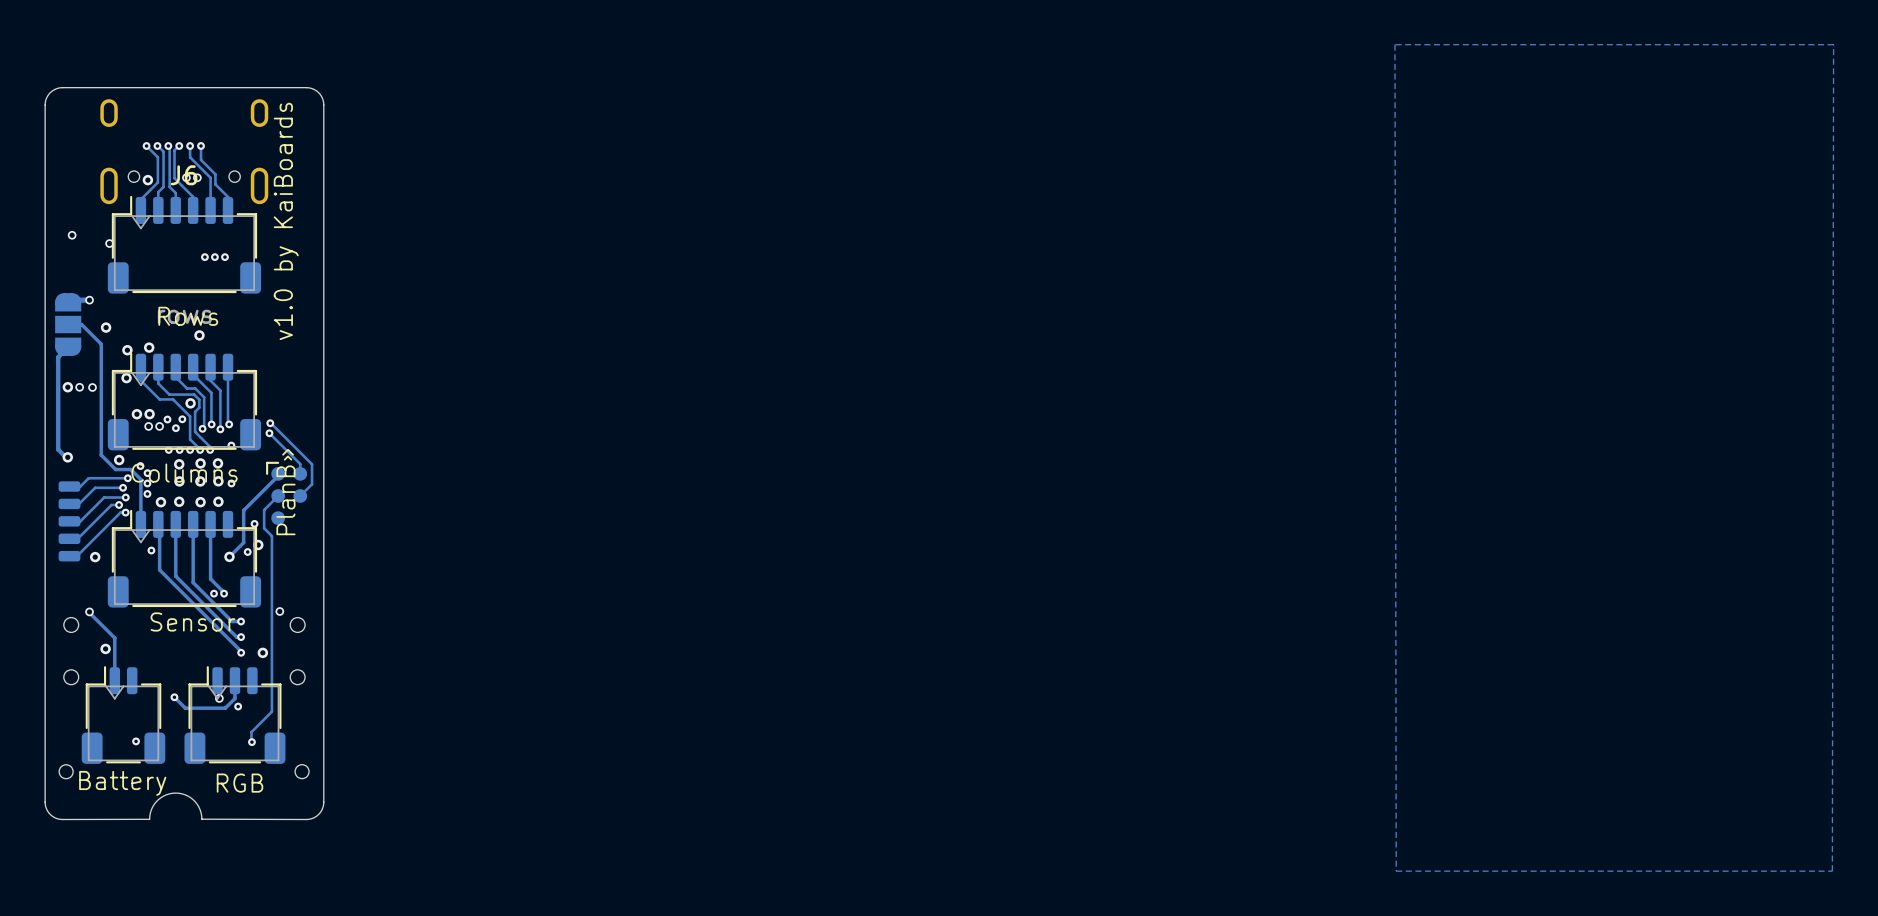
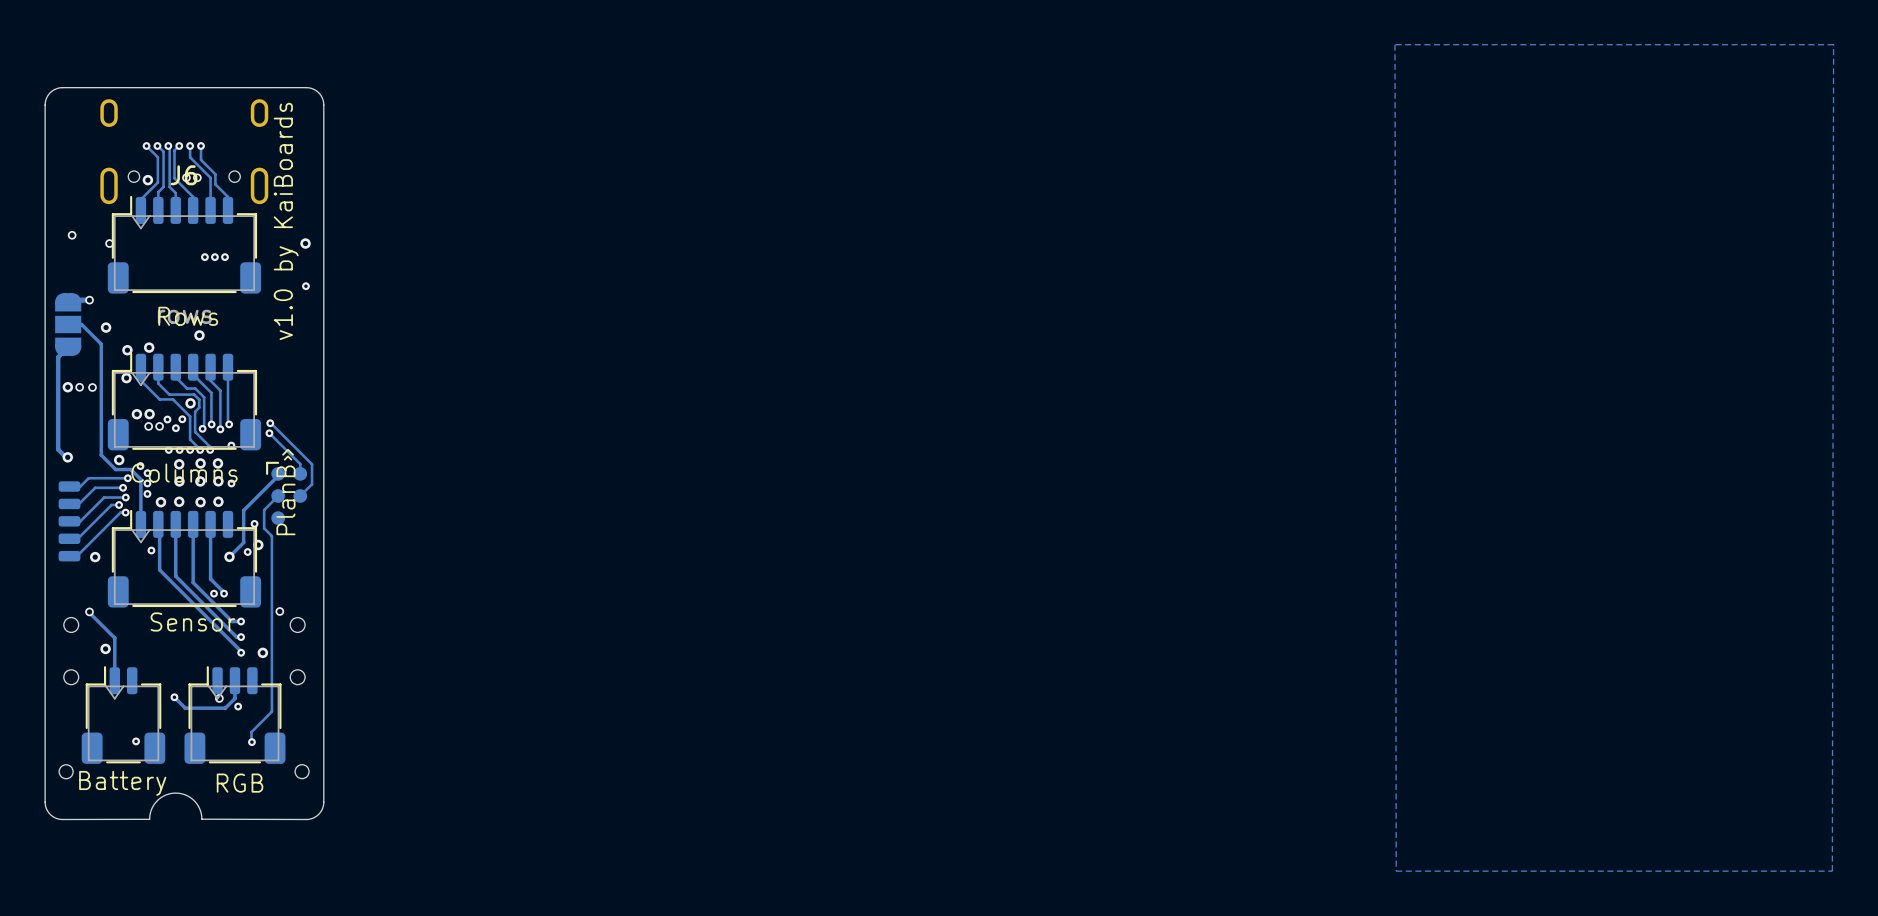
via: none -> (305, 243)
via: none -> (305, 286)

